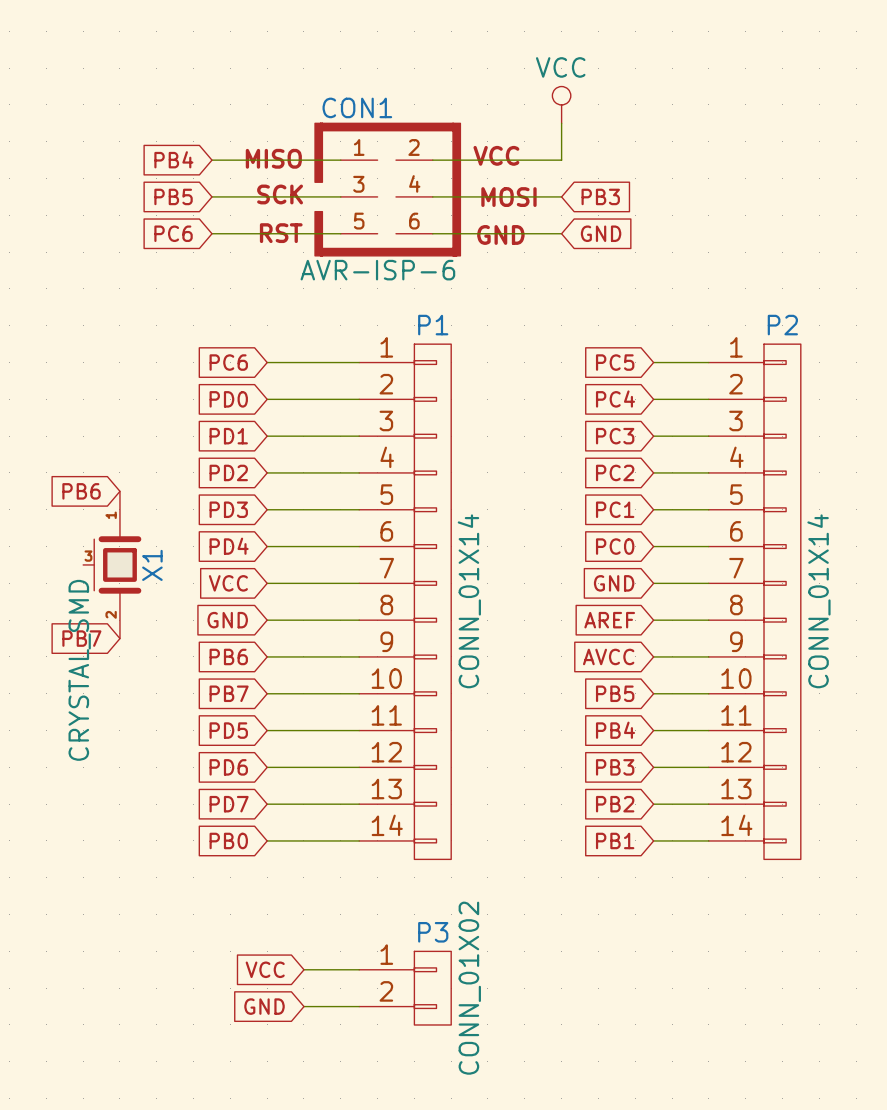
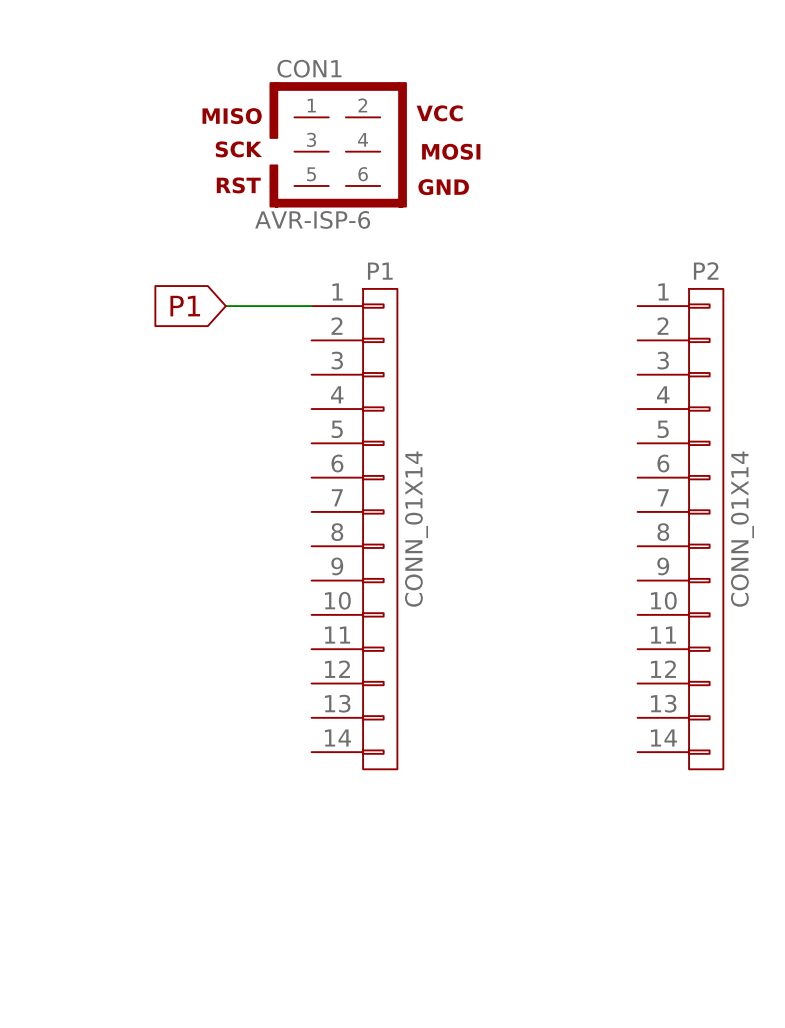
power symbol: VCC (561, 104) -> none
wire: (561, 123) (561, 160) (432, 160) -> none
global label: PB4 (173, 159) -> none
wire: (211, 160) (340, 160) -> none
global label: PB5 (173, 196) -> none
wire: (211, 196) (340, 196) -> none
wire: (432, 196) (561, 196) -> none
global label: PB3 (600, 196) -> none
global label: PC6 (173, 233) -> none
wire: (211, 233) (340, 233) -> none
wire: (432, 233) (561, 233) -> none
global label: GND (601, 233) -> none
global label: PC6 (228, 362) -> P1 (185, 306)
global label: PC5 (615, 362) -> none
wire: (653, 362) (708, 362) -> none
global label: PD0 (228, 399) -> none
wire: (267, 399) (359, 399) -> none
global label: PC4 (615, 399) -> none
wire: (653, 399) (708, 399) -> none
global label: PD1 (228, 436) -> none
wire: (267, 436) (359, 436) -> none
global label: PC3 (615, 436) -> none
wire: (653, 436) (708, 436) -> none
global label: PD2 (228, 472) -> none
wire: (267, 472) (359, 472) -> none
global label: PC2 (615, 472) -> none
wire: (653, 472) (708, 472) -> none
global label: PB6 (81, 491) -> none
global label: PD3 (228, 509) -> none
wire: (267, 509) (359, 509) -> none
global label: PC1 (615, 509) -> none
wire: (653, 509) (708, 509) -> none
global label: PD4 (229, 546) -> none
wire: (267, 546) (359, 546) -> none
global label: PC0 (615, 546) -> none
wire: (653, 546) (708, 546) -> none
X1: CRYSTAL_SMD (112, 564) -> none
global label: VCC (228, 583) -> none
wire: (267, 583) (359, 583) -> none
global label: GND (614, 583) -> none
wire: (653, 583) (708, 583) -> none
global label: GND (227, 620) -> none
wire: (267, 620) (359, 620) -> none
global label: AREF (609, 620) -> none
wire: (653, 620) (708, 620) -> none
global label: PB7 (81, 638) -> none
global label: PB6 (228, 656) -> none
wire: (267, 656) (359, 656) -> none
global label: AVCC (608, 656) -> none
wire: (653, 656) (708, 656) -> none
global label: PB7 (229, 693) -> none
wire: (267, 693) (359, 693) -> none
global label: PB5 (615, 693) -> none
wire: (653, 693) (708, 693) -> none
global label: PD5 (228, 730) -> none
wire: (267, 730) (359, 730) -> none
global label: PB4 (615, 730) -> none
wire: (653, 730) (708, 730) -> none
global label: PD6 (228, 767) -> none
wire: (267, 767) (359, 767) -> none
global label: PB3 (615, 767) -> none
wire: (653, 767) (708, 767) -> none
global label: PD7 (229, 804) -> none
wire: (267, 804) (359, 804) -> none
global label: PB2 (615, 804) -> none
wire: (653, 804) (708, 804) -> none
global label: PB0 (228, 840) -> none
wire: (267, 840) (359, 840) -> none
global label: PB1 (615, 840) -> none
wire: (653, 840) (708, 840) -> none
global label: VCC (265, 969) -> none
wire: (303, 969) (359, 969) -> none
P3: CONN_01X02 (405, 988) -> none
global label: GND (264, 1006) -> none
wire: (303, 1006) (359, 1006) -> none

